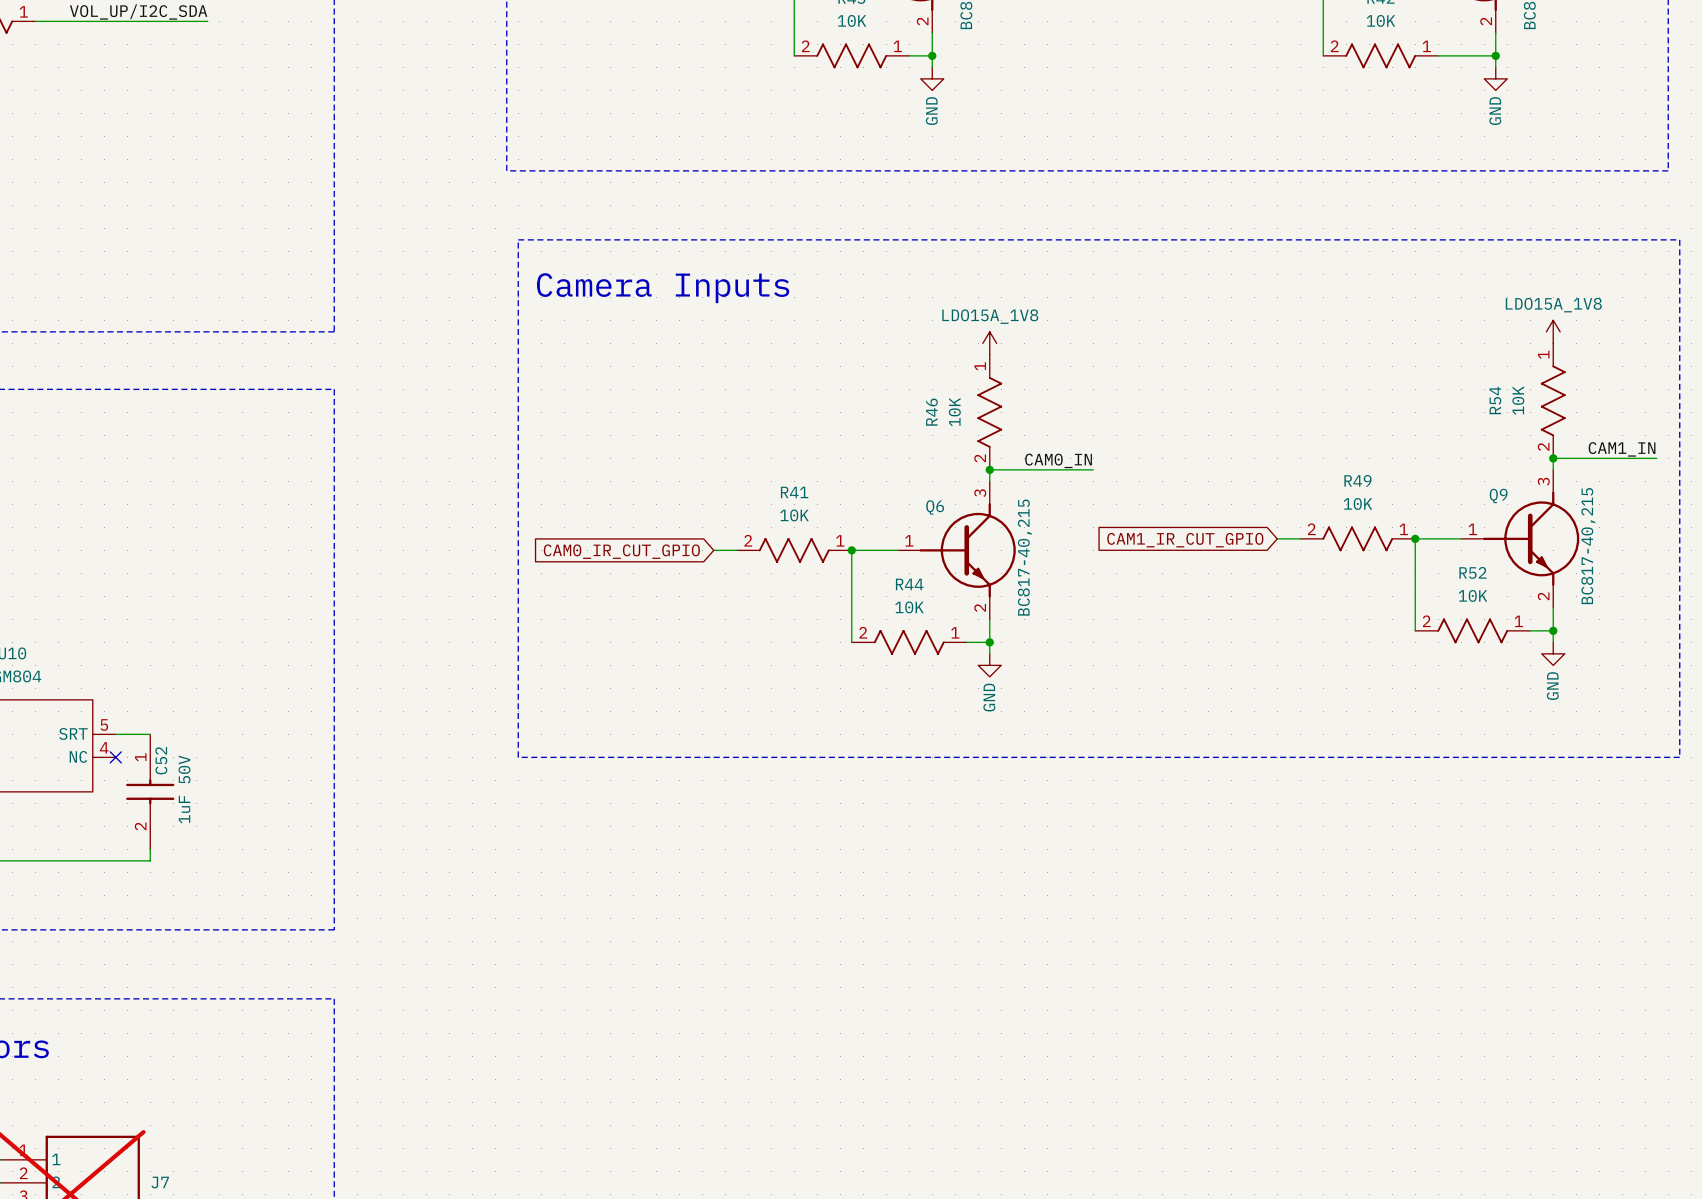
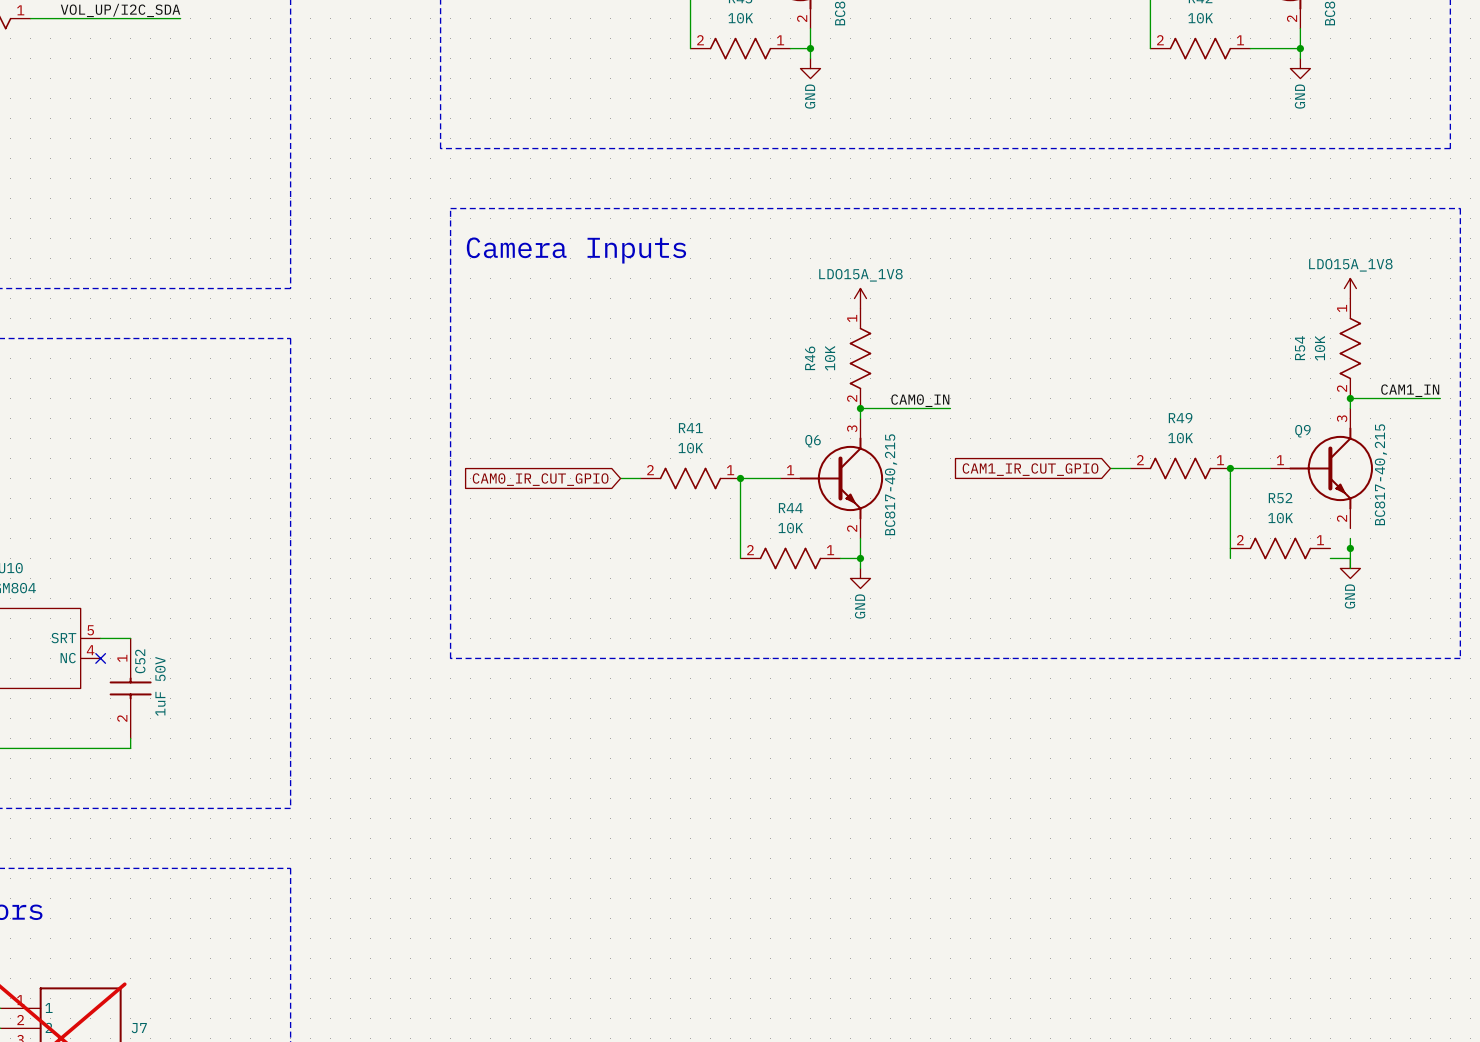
wire: (1553, 607) (1553, 619) -> (1230, 548) (1230, 558)
wire: (1530, 630) (1553, 630) -> none
wire: none -> (1330, 558) (1350, 558) (1350, 568)

